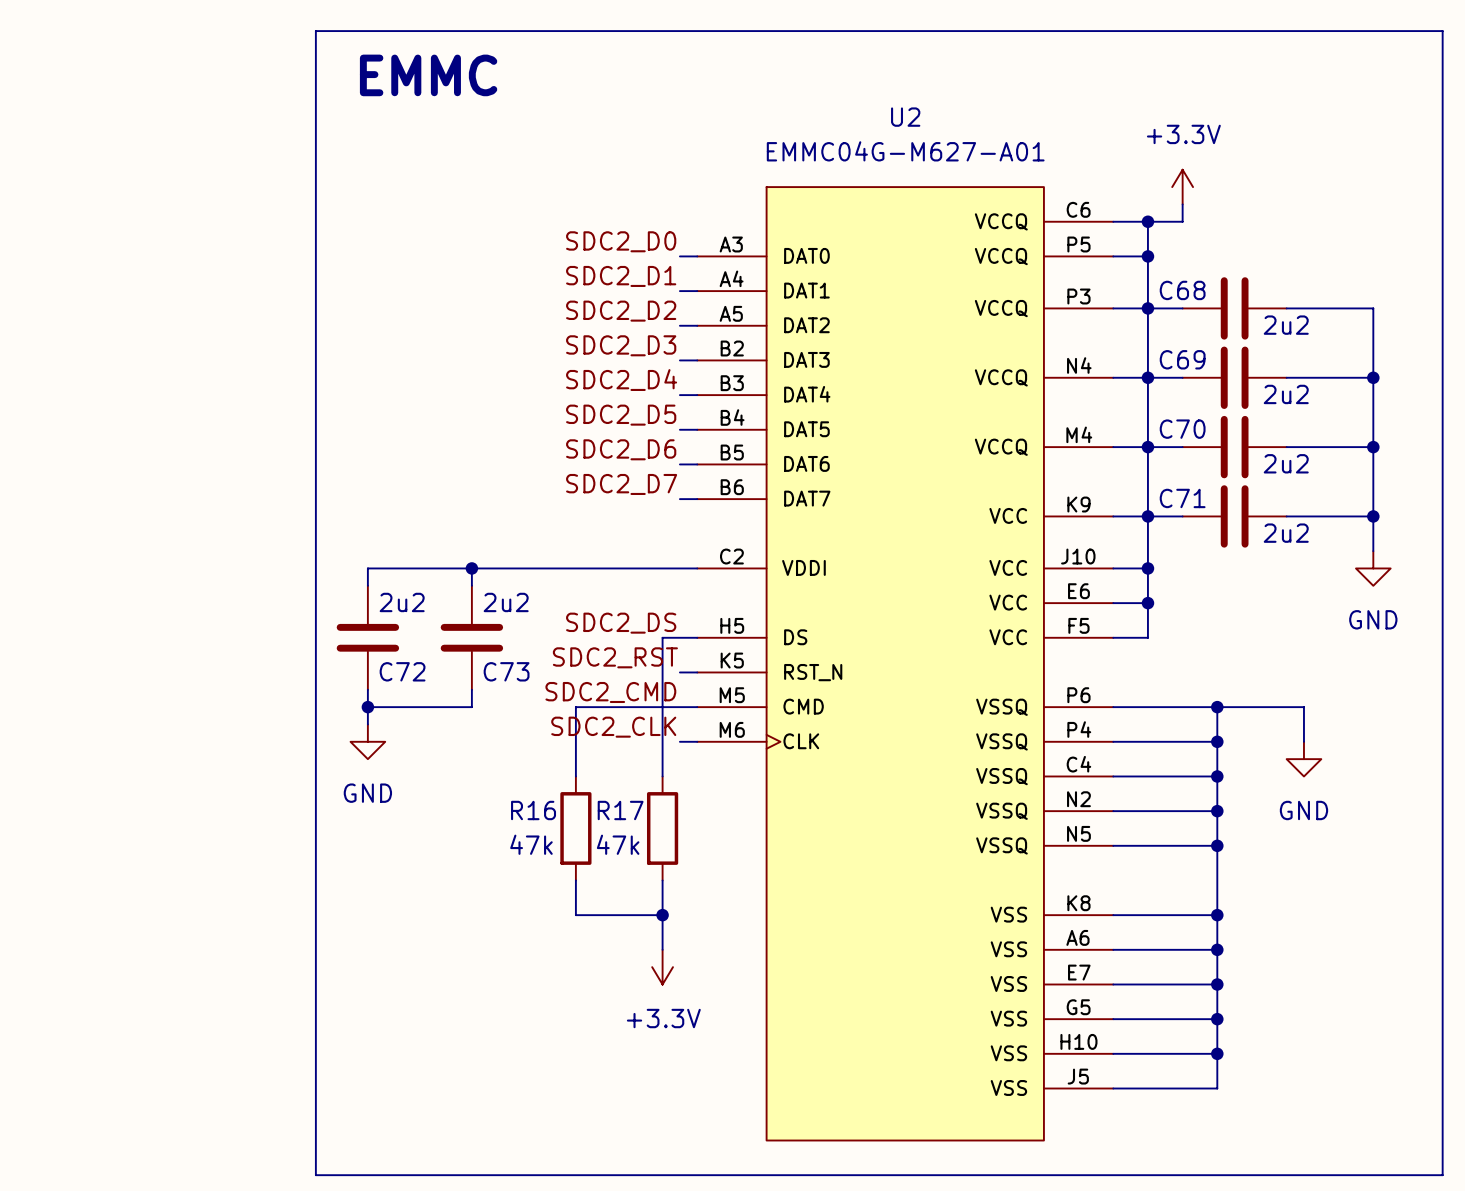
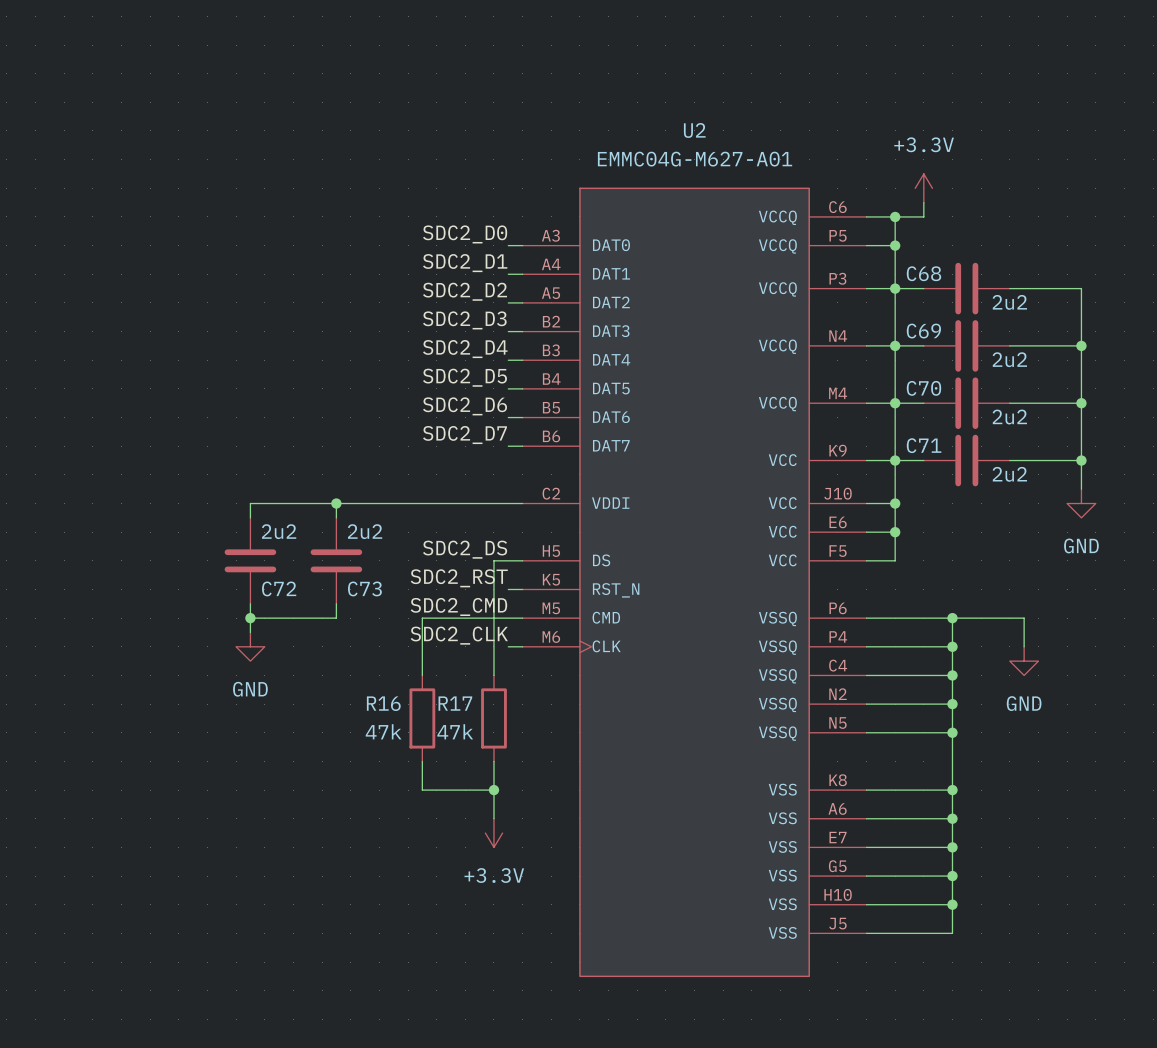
line: (315, 31) (1442, 31) (1442, 1175) (315, 1175) (315, 31) -> none
text: EMMC (428, 75) -> none

